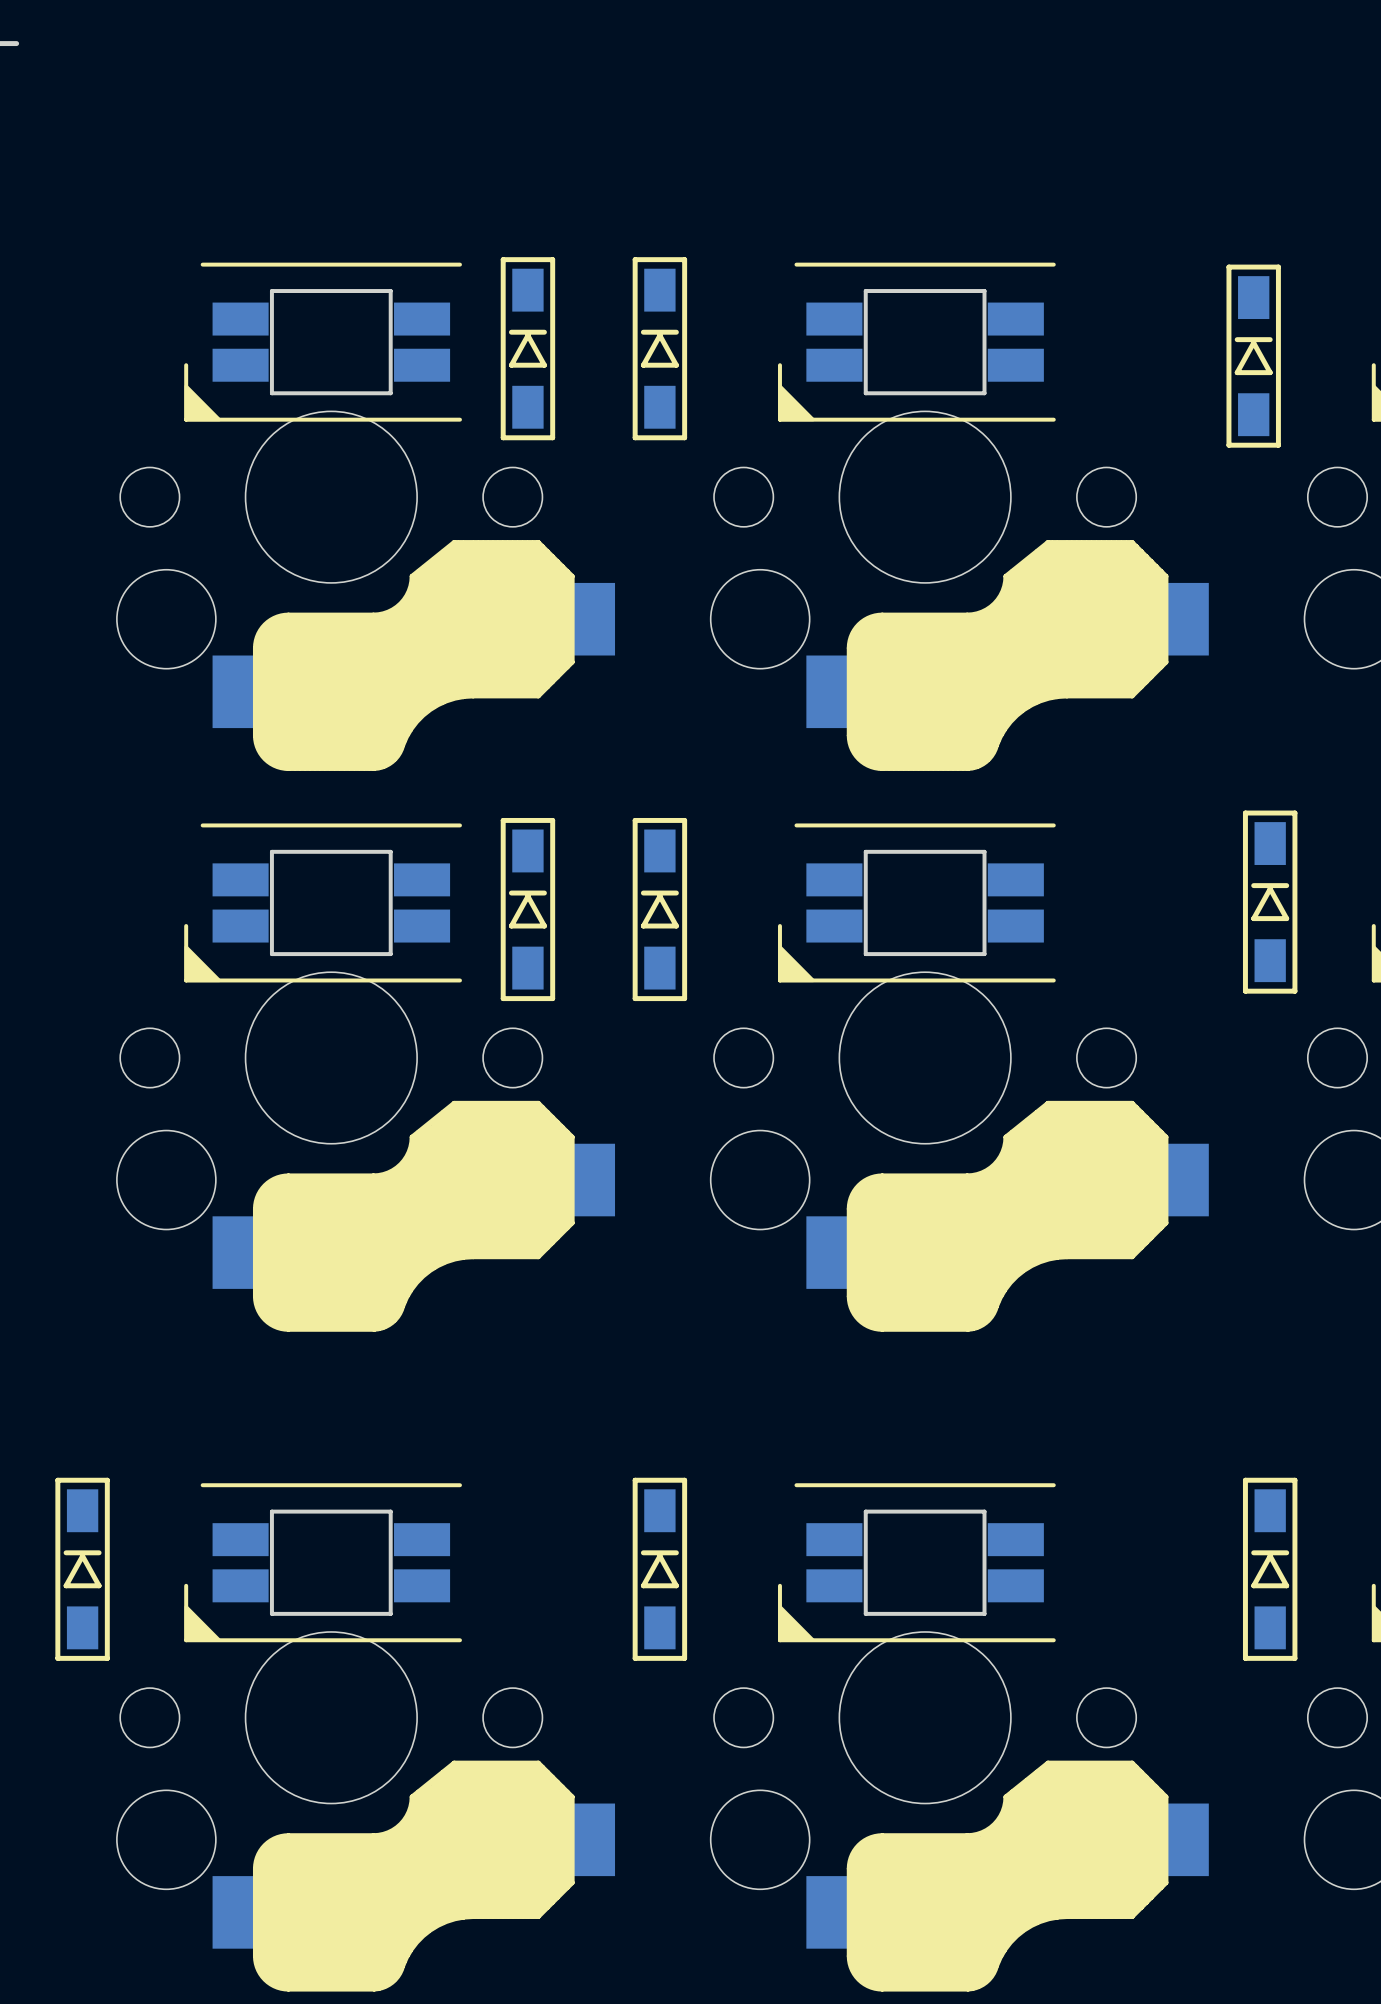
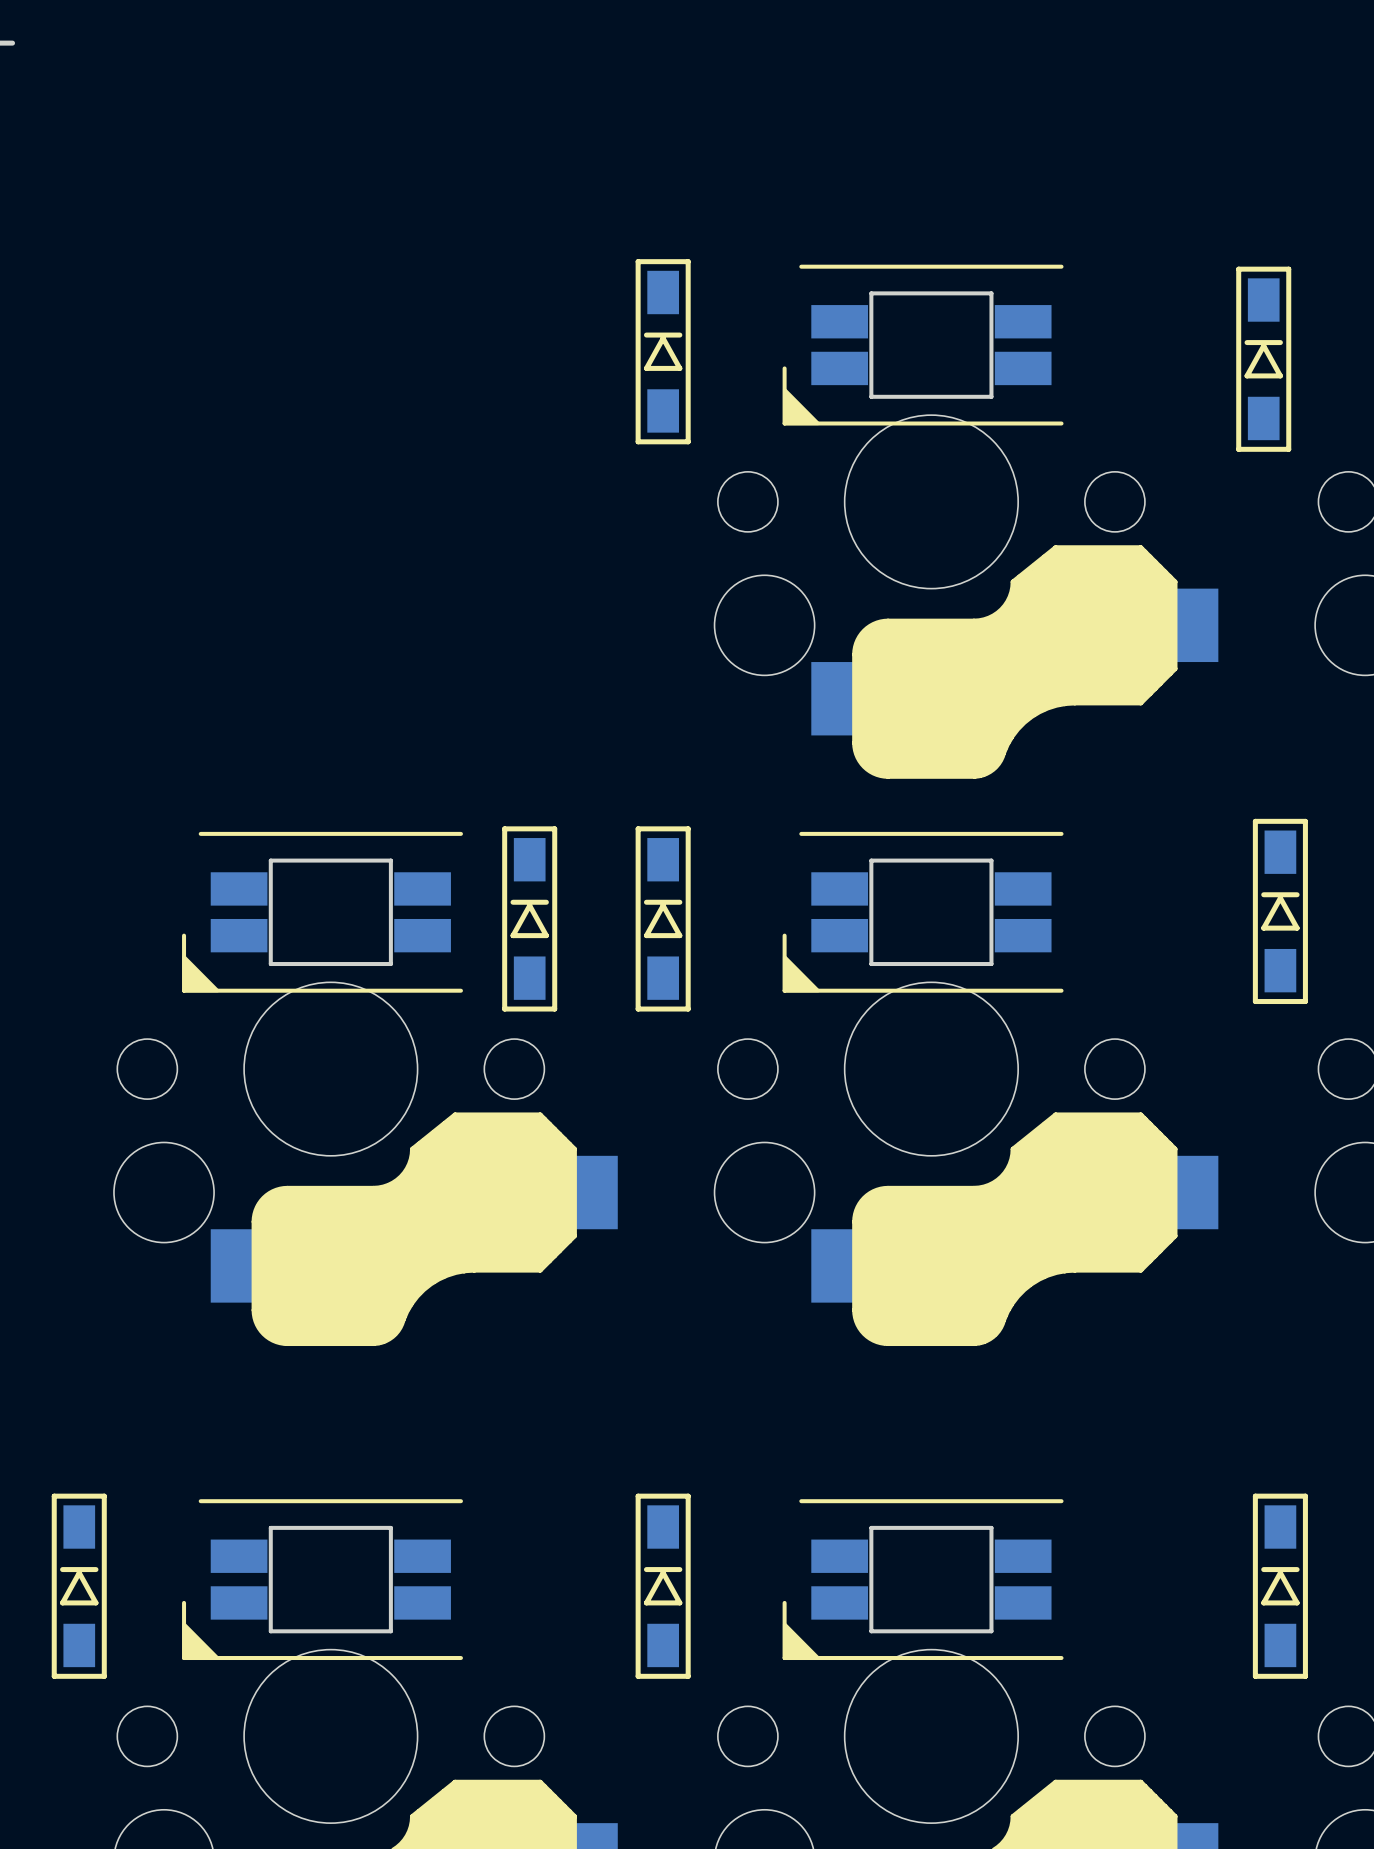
part: (527, 348) -> none
part: (365, 516) -> none

